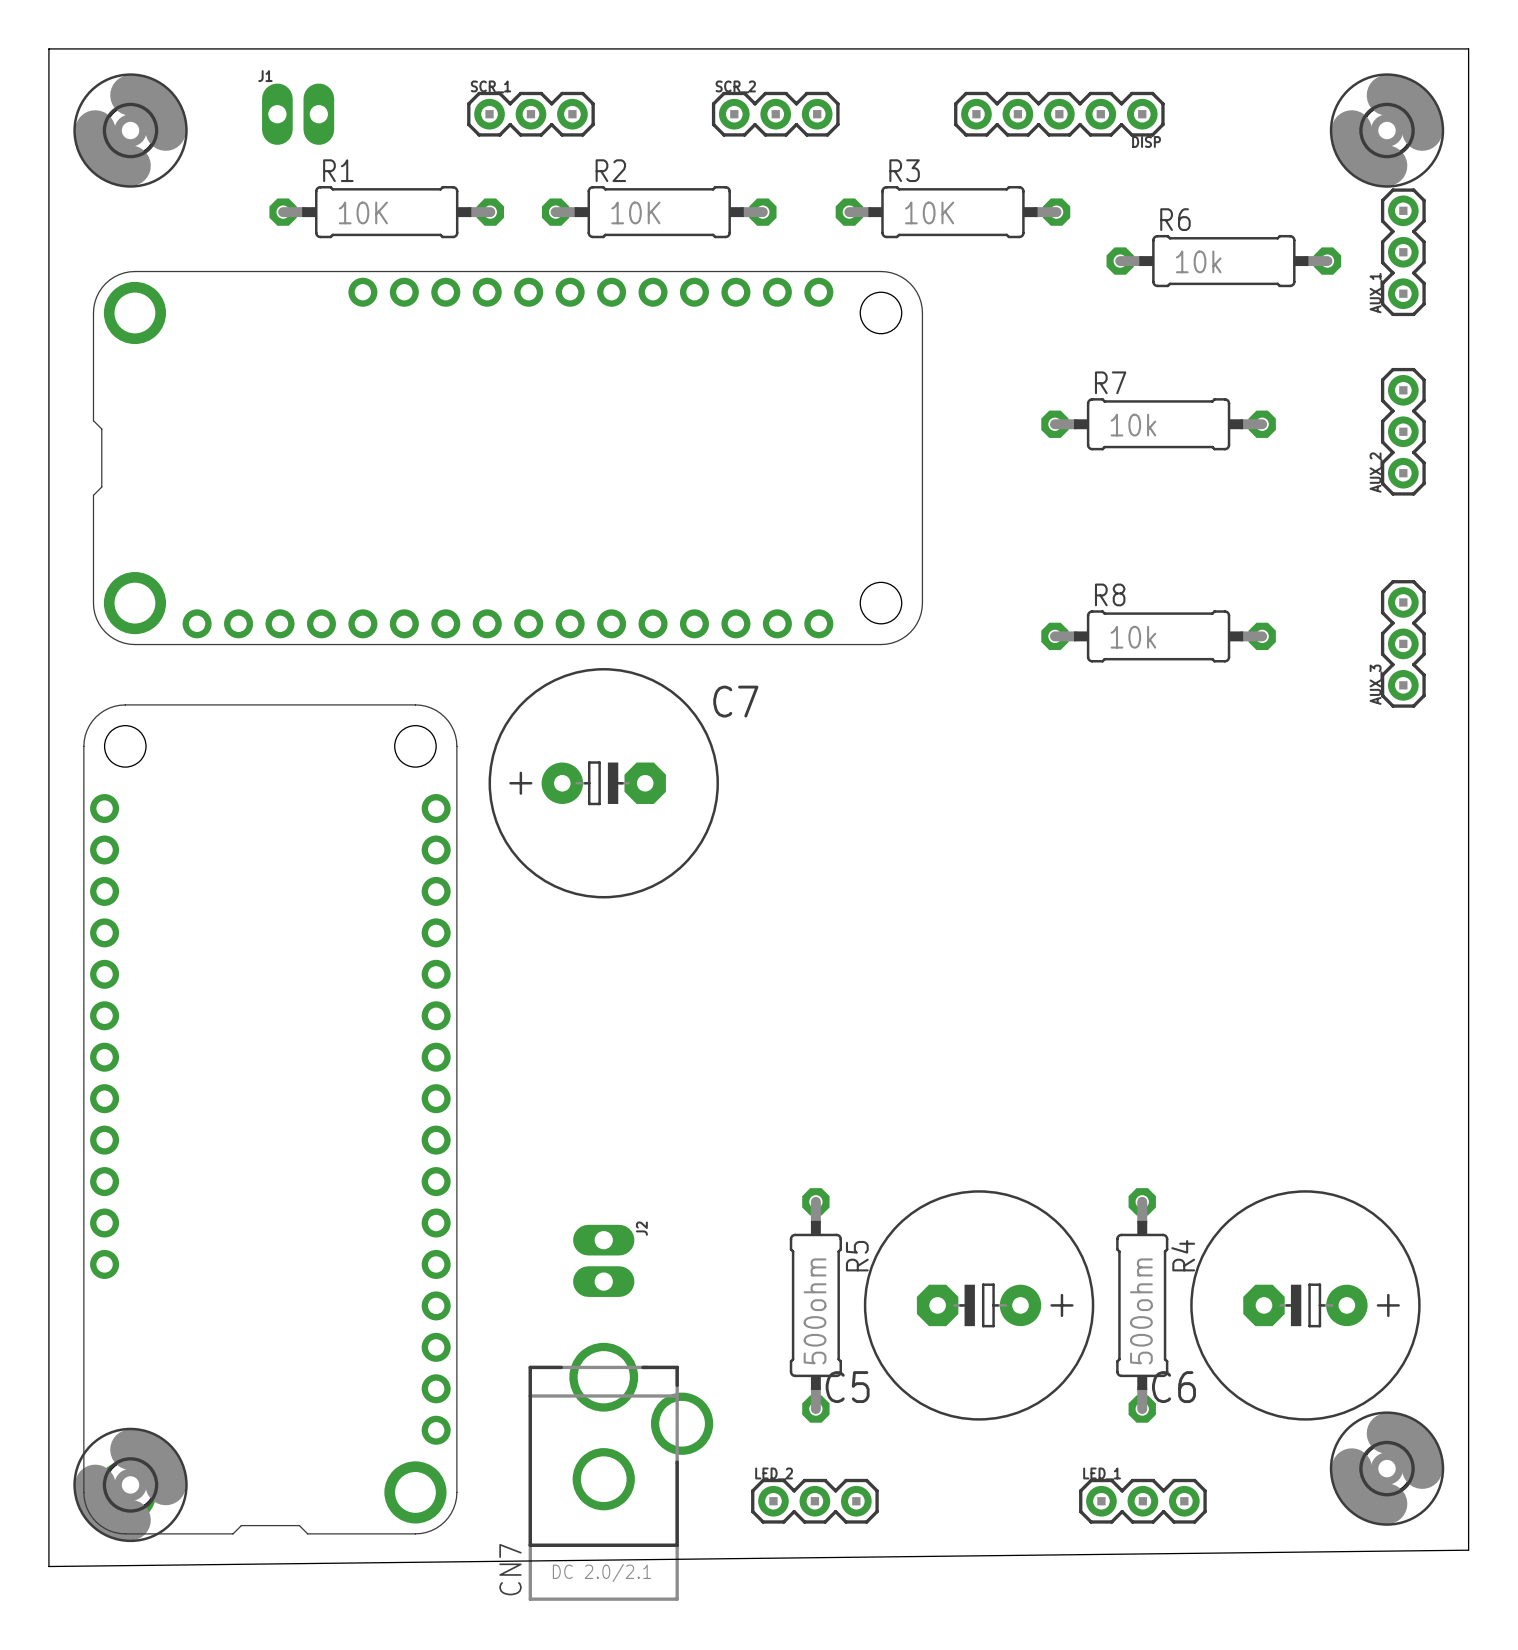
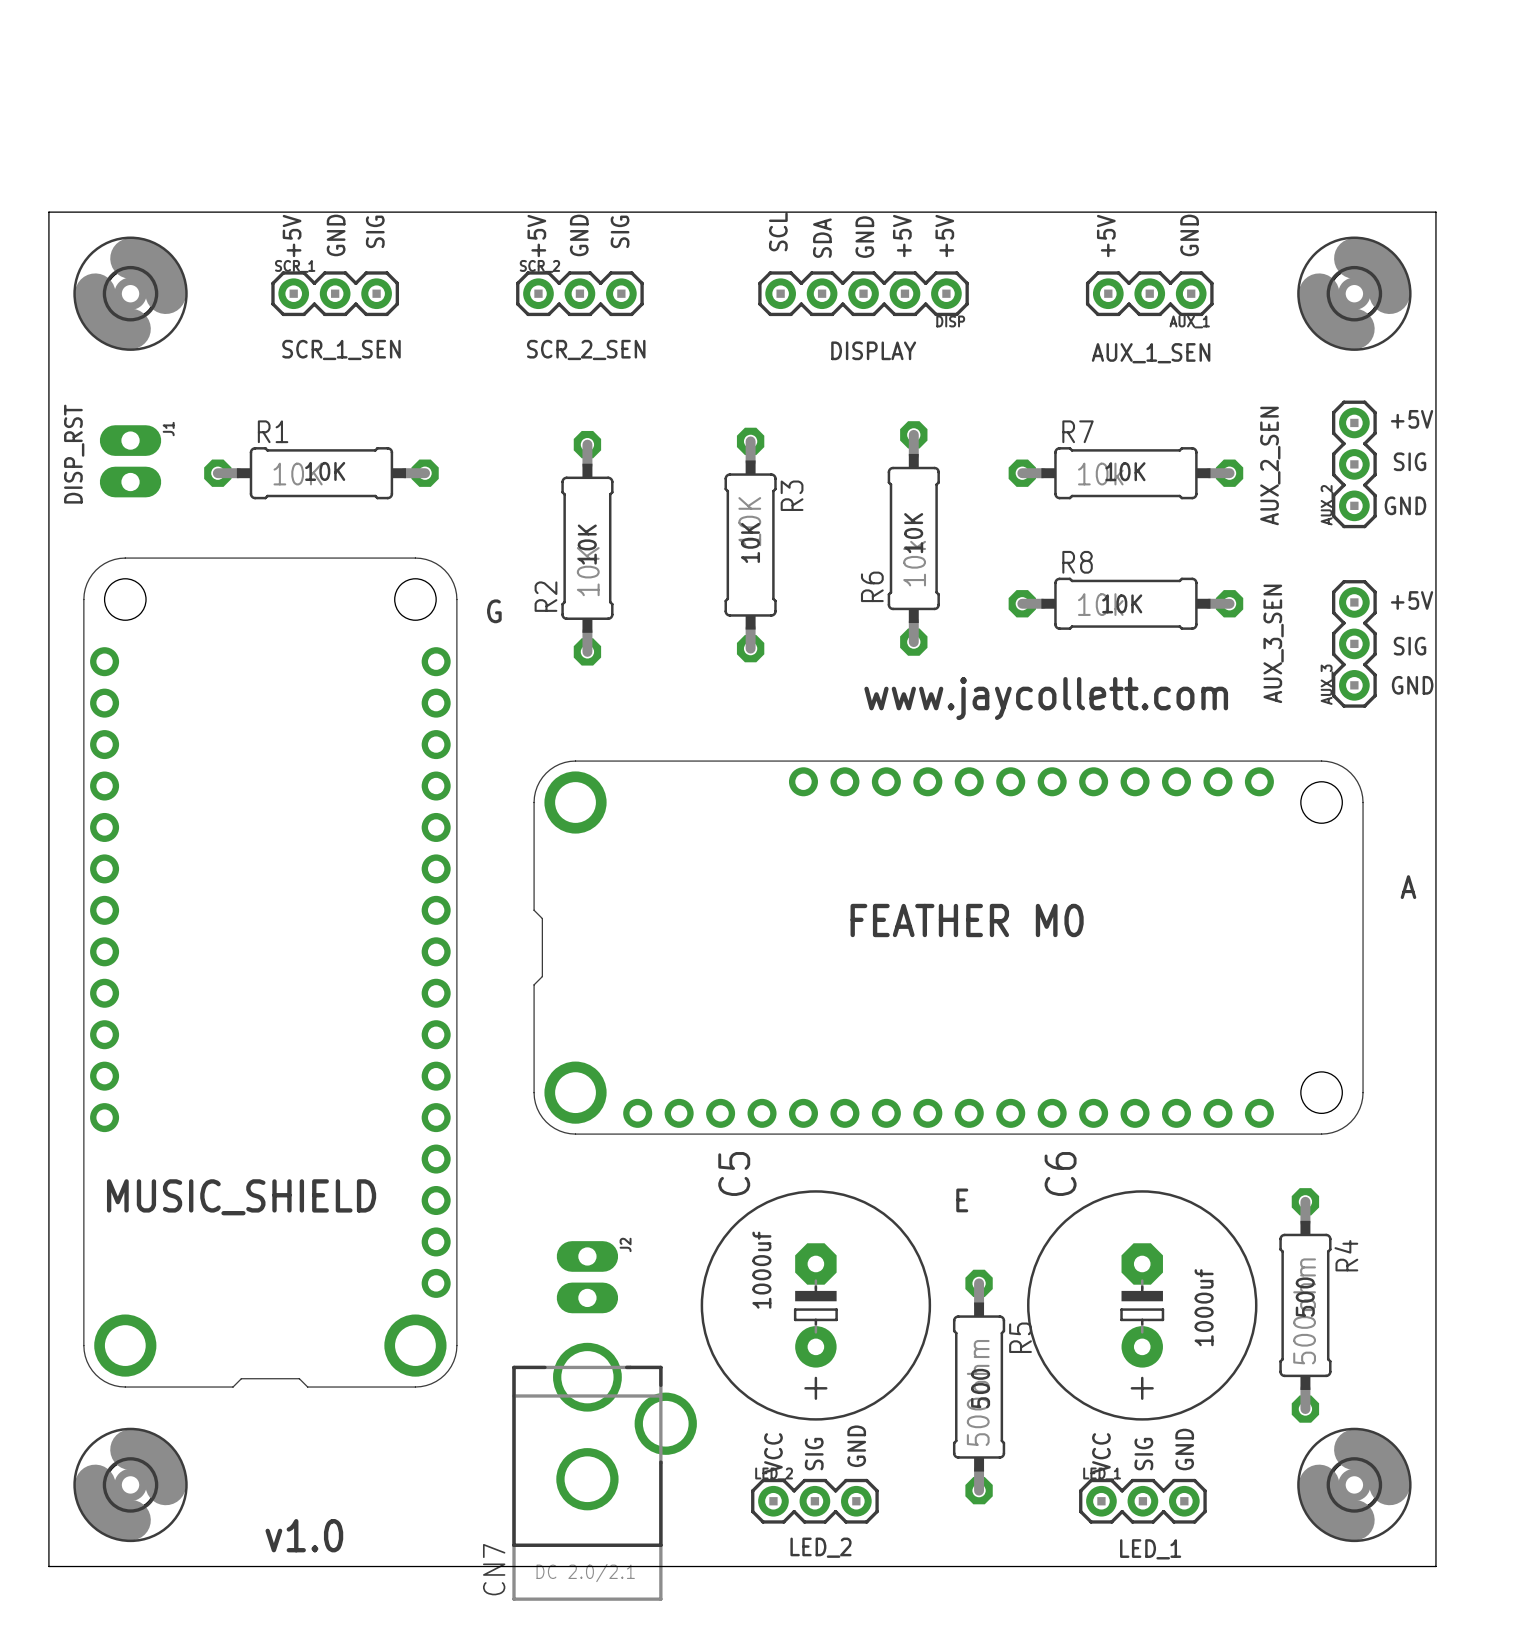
J1 rotation: 0° (298, 114) -> 90° clockwise (130, 461)
J1 position: (298, 114) -> (130, 461)
SCR_1 position: (530, 114) -> (335, 293)
SCR_2 position: (775, 114) -> (579, 293)
DISP position: (1059, 114) -> (863, 293)
part position: (130, 130) -> (130, 293)
part position: (1387, 130) -> (1354, 293)
R2 name position: R2 (610, 170) -> R2 (545, 596)
board edge: (48, 212) (48, 48) (1468, 48) (1468, 1550) (48, 1566) -> (48, 212) (1435, 212) (1435, 1566) (48, 1566)
R1 position: (386, 212) -> (321, 473)
R2 rotation: 0° (659, 212) -> 90° clockwise (587, 548)
R2 position: (659, 212) -> (587, 548)
R3 rotation: 0° (952, 212) -> 90° clockwise (750, 545)
R3 position: (952, 212) -> (750, 545)
R6 name position: R6 (1175, 219) -> R6 (872, 586)
text: none -> SIG (375, 231)
text: none -> SIG (620, 231)
text: none -> SCL (778, 231)
text: none -> GND (336, 235)
text: none -> GND (579, 235)
text: none -> GND (1189, 235)
text: none -> +5V (292, 236)
text: none -> +5V (536, 236)
text: none -> +5V (902, 236)
text: none -> +5V (944, 236)
text: none -> +5V (1106, 236)
text: none -> GND (864, 237)
text: none -> SDA (822, 238)
AUX_1 rotation: 0° (1403, 252) -> 90° clockwise (1149, 293)
AUX_1 position: (1403, 252) -> (1149, 293)
R6 rotation: 0° (1223, 261) -> 90° clockwise (913, 538)
R6 position: (1223, 261) -> (913, 538)
AUX_1 name position: AUX_1 (1376, 293) -> AUX_1 (1189, 321)
text: none -> SCR_1_SEN (341, 349)
text: none -> SCR_2_SEN (586, 349)
text: none -> DISPLAY (873, 350)
text: none -> AUX_1_SEN (1151, 353)
text: none -> +5V (1412, 419)
R7 position: (1158, 424) -> (1125, 473)
AUX_2 position: (1403, 431) -> (1354, 464)
text: none -> DISP_RST (74, 454)
part: (507, 458) -> none
text: none -> SIG (1410, 461)
text: none -> AUX_2_SEN (1270, 466)
text: none -> 10K (325, 471)
text: none -> 10K (1125, 471)
text: none -> GND (1405, 505)
text: none -> 10K (913, 533)
text: none -> 10K (750, 542)
text: none -> 10K (587, 544)
text: none -> +5V (1412, 600)
text: none -> 10K (1122, 603)
text: none -> G (494, 611)
R8 position: (1158, 636) -> (1125, 603)
text: none -> AUX_3_SEN (1273, 643)
AUX_3 position: (1403, 643) -> (1354, 643)
text: none -> SIG (1410, 646)
text: none -> GND (1412, 685)
text: none -> www.jaycollett.com (1046, 698)
C7: (603, 783) -> none
text: none -> A (1408, 887)
text: none -> FEATHER M0 (967, 920)
part: none -> (948, 947)
part position: (270, 1119) -> (270, 972)
text: none -> MUSIC_SHIELD (241, 1197)
text: none -> E (962, 1200)
J2 position: (603, 1260) -> (587, 1277)
text: none -> 1000uf (761, 1270)
text: none -> 500 (1305, 1297)
R5 position: (815, 1305) -> (979, 1387)
C5 rotation: 0° (979, 1305) -> 90° clockwise (815, 1305)
C5 position: (979, 1305) -> (815, 1305)
R4 position: (1142, 1305) -> (1305, 1305)
C6 rotation: 0° (1305, 1305) -> 90° clockwise (1142, 1305)
C6 position: (1305, 1305) -> (1142, 1305)
text: none -> 1000uf (1204, 1307)
text: none -> 500 (980, 1388)
text: none -> GND (856, 1446)
text: none -> GND (1184, 1449)
text: none -> VCC (773, 1453)
text: none -> VCC (1101, 1453)
text: none -> SIG (814, 1454)
text: none -> SIG (1143, 1454)
part position: (1387, 1468) -> (1354, 1484)
CN7 position: (620, 1471) -> (604, 1471)
text: none -> v1.0 (304, 1535)
text: none -> LED_2 (820, 1547)
text: none -> LED_1 (1150, 1549)

